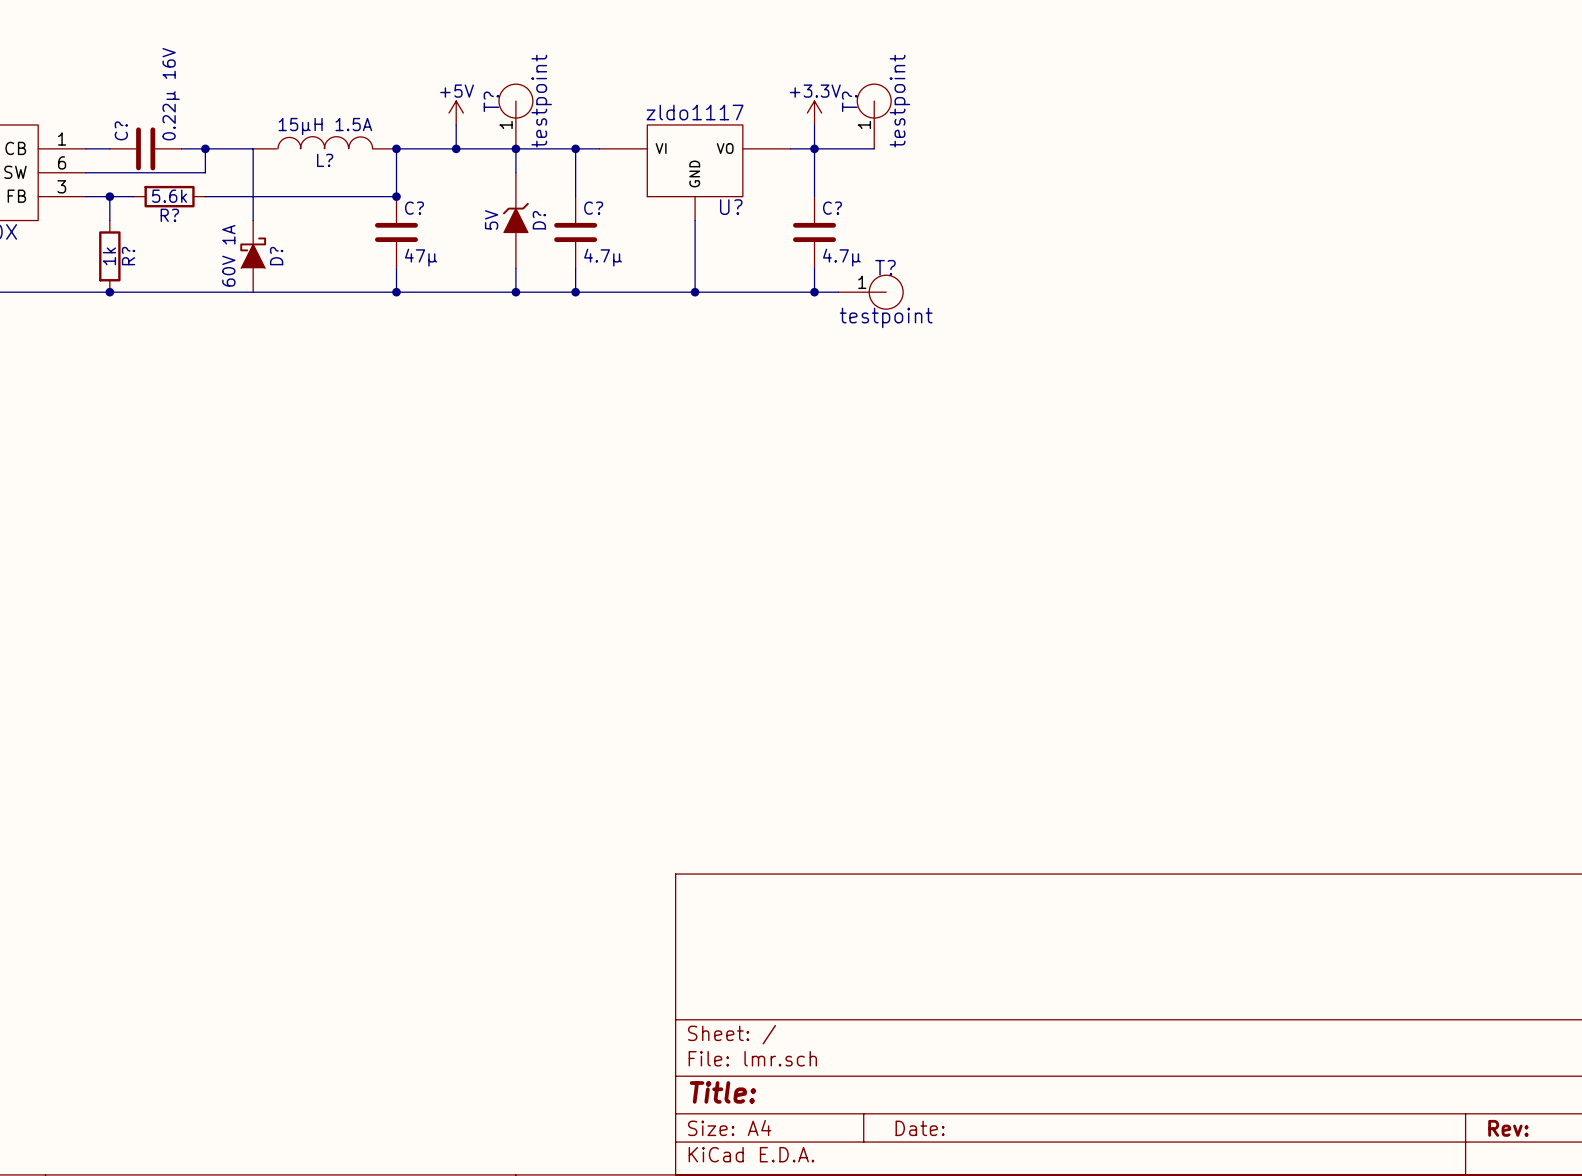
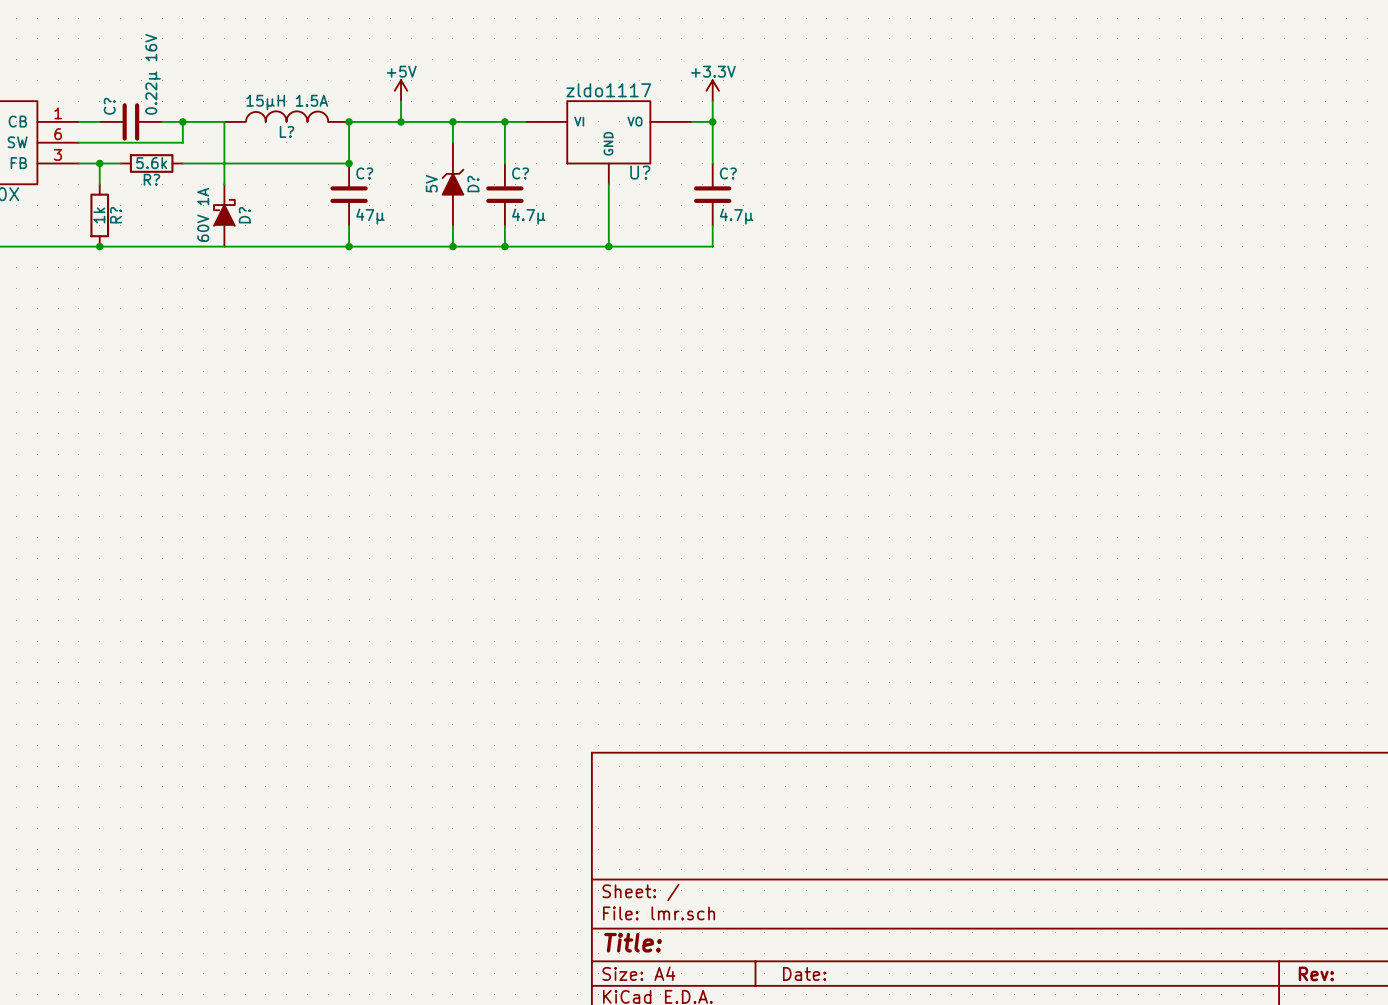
T?: testpoint (515, 116) -> none
T?: testpoint (874, 116) -> none
wire: (814, 148) (874, 148) -> none
wire: (814, 292) (838, 292) -> none
junction: (814, 292) -> none
T?: testpoint (870, 292) -> none

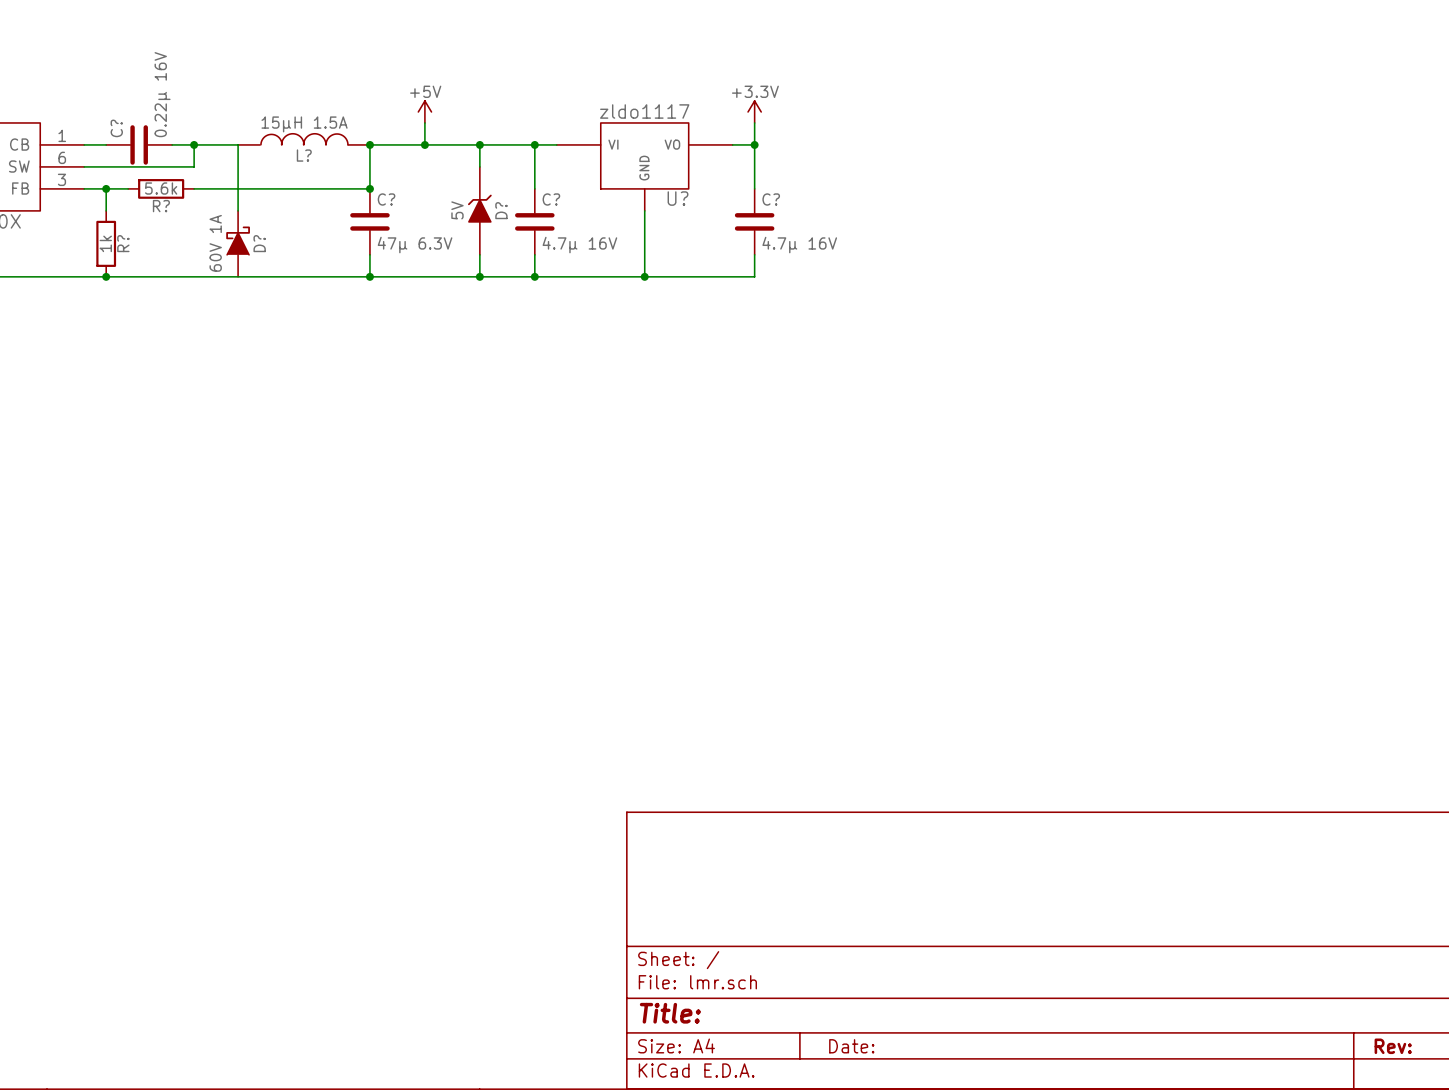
C? value: 47µ (370, 216) -> 47µ 6.3V (415, 245)
C? value: 4.7µ (528, 216) -> 4.7µ 16V (579, 245)
C? value: 4.7µ (736, 216) -> 4.7µ 16V (799, 245)

